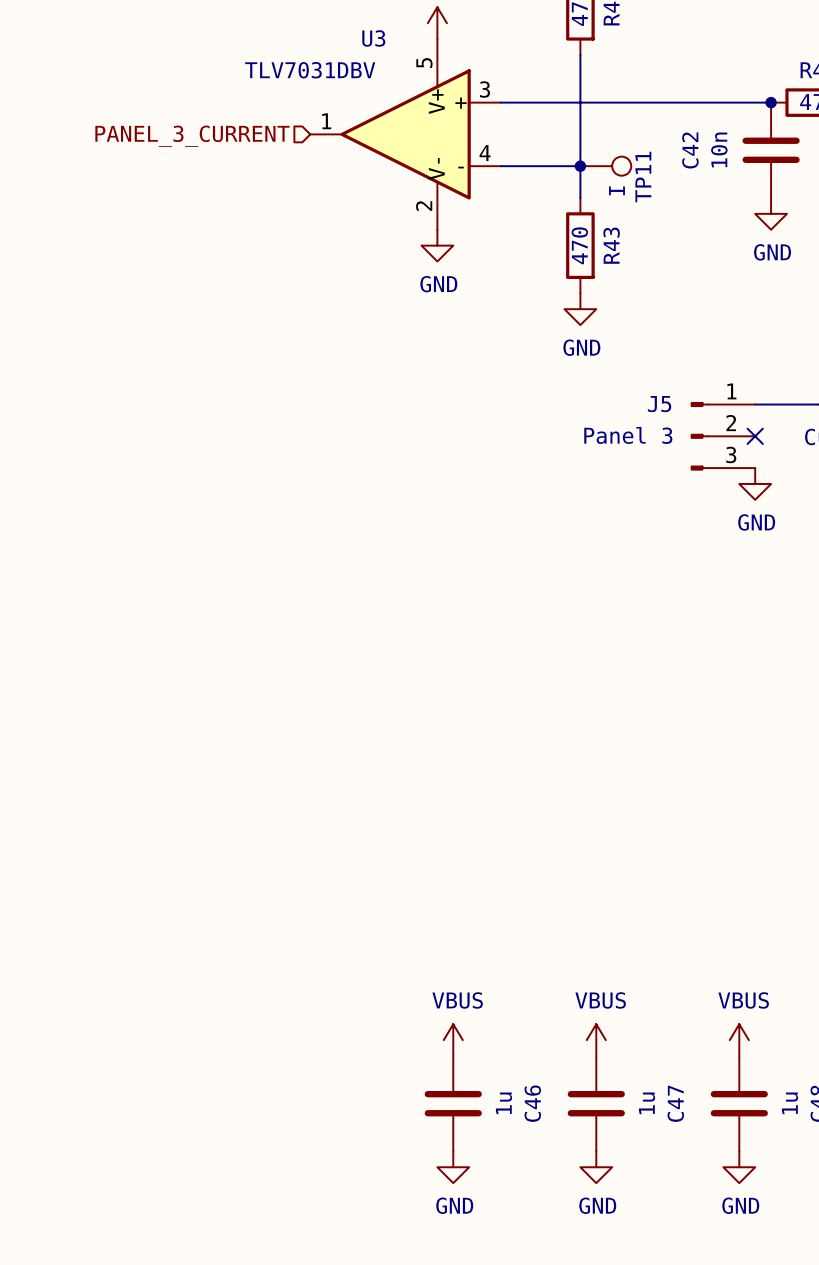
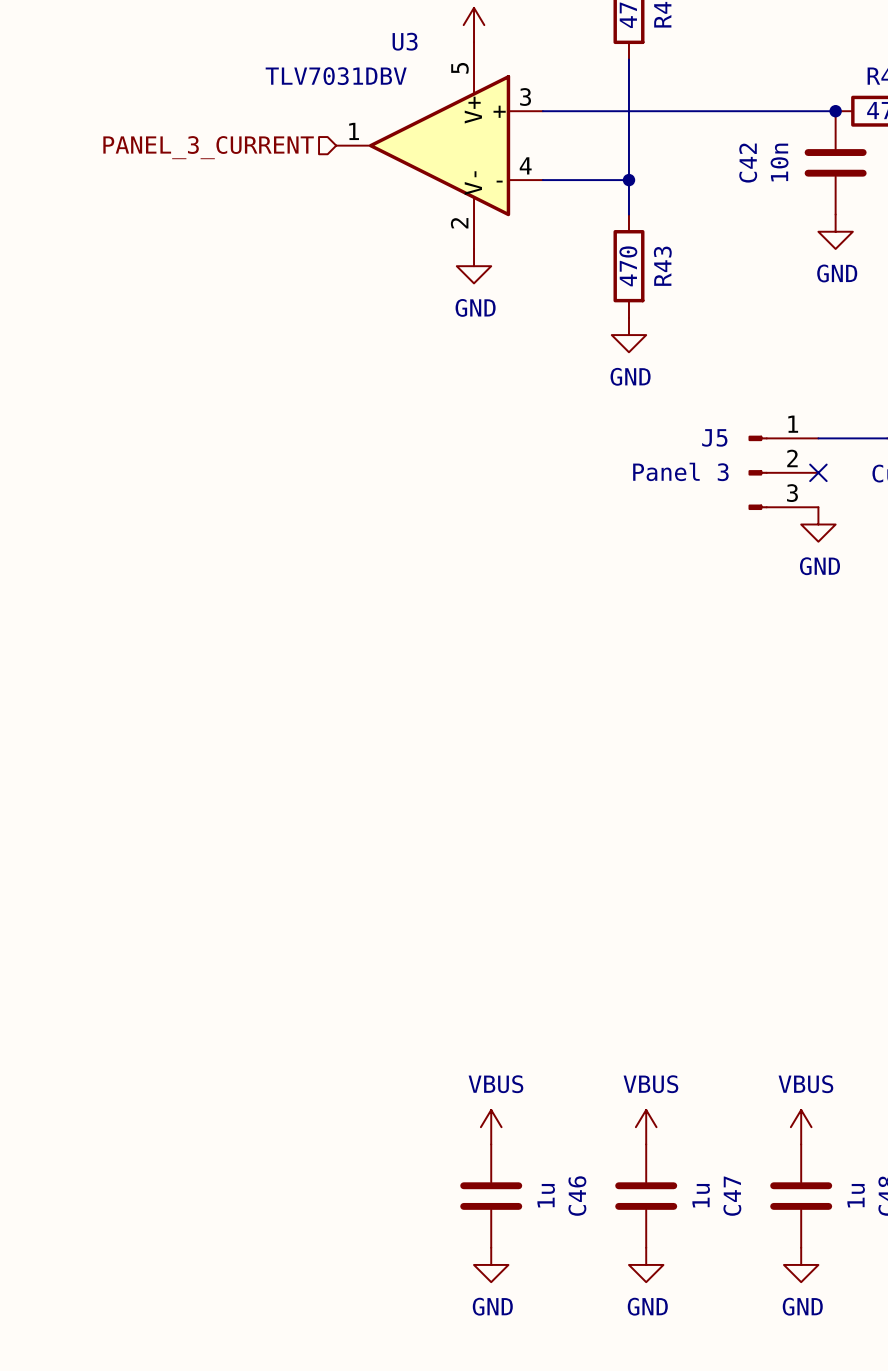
TP11: I (605, 166) -> none

